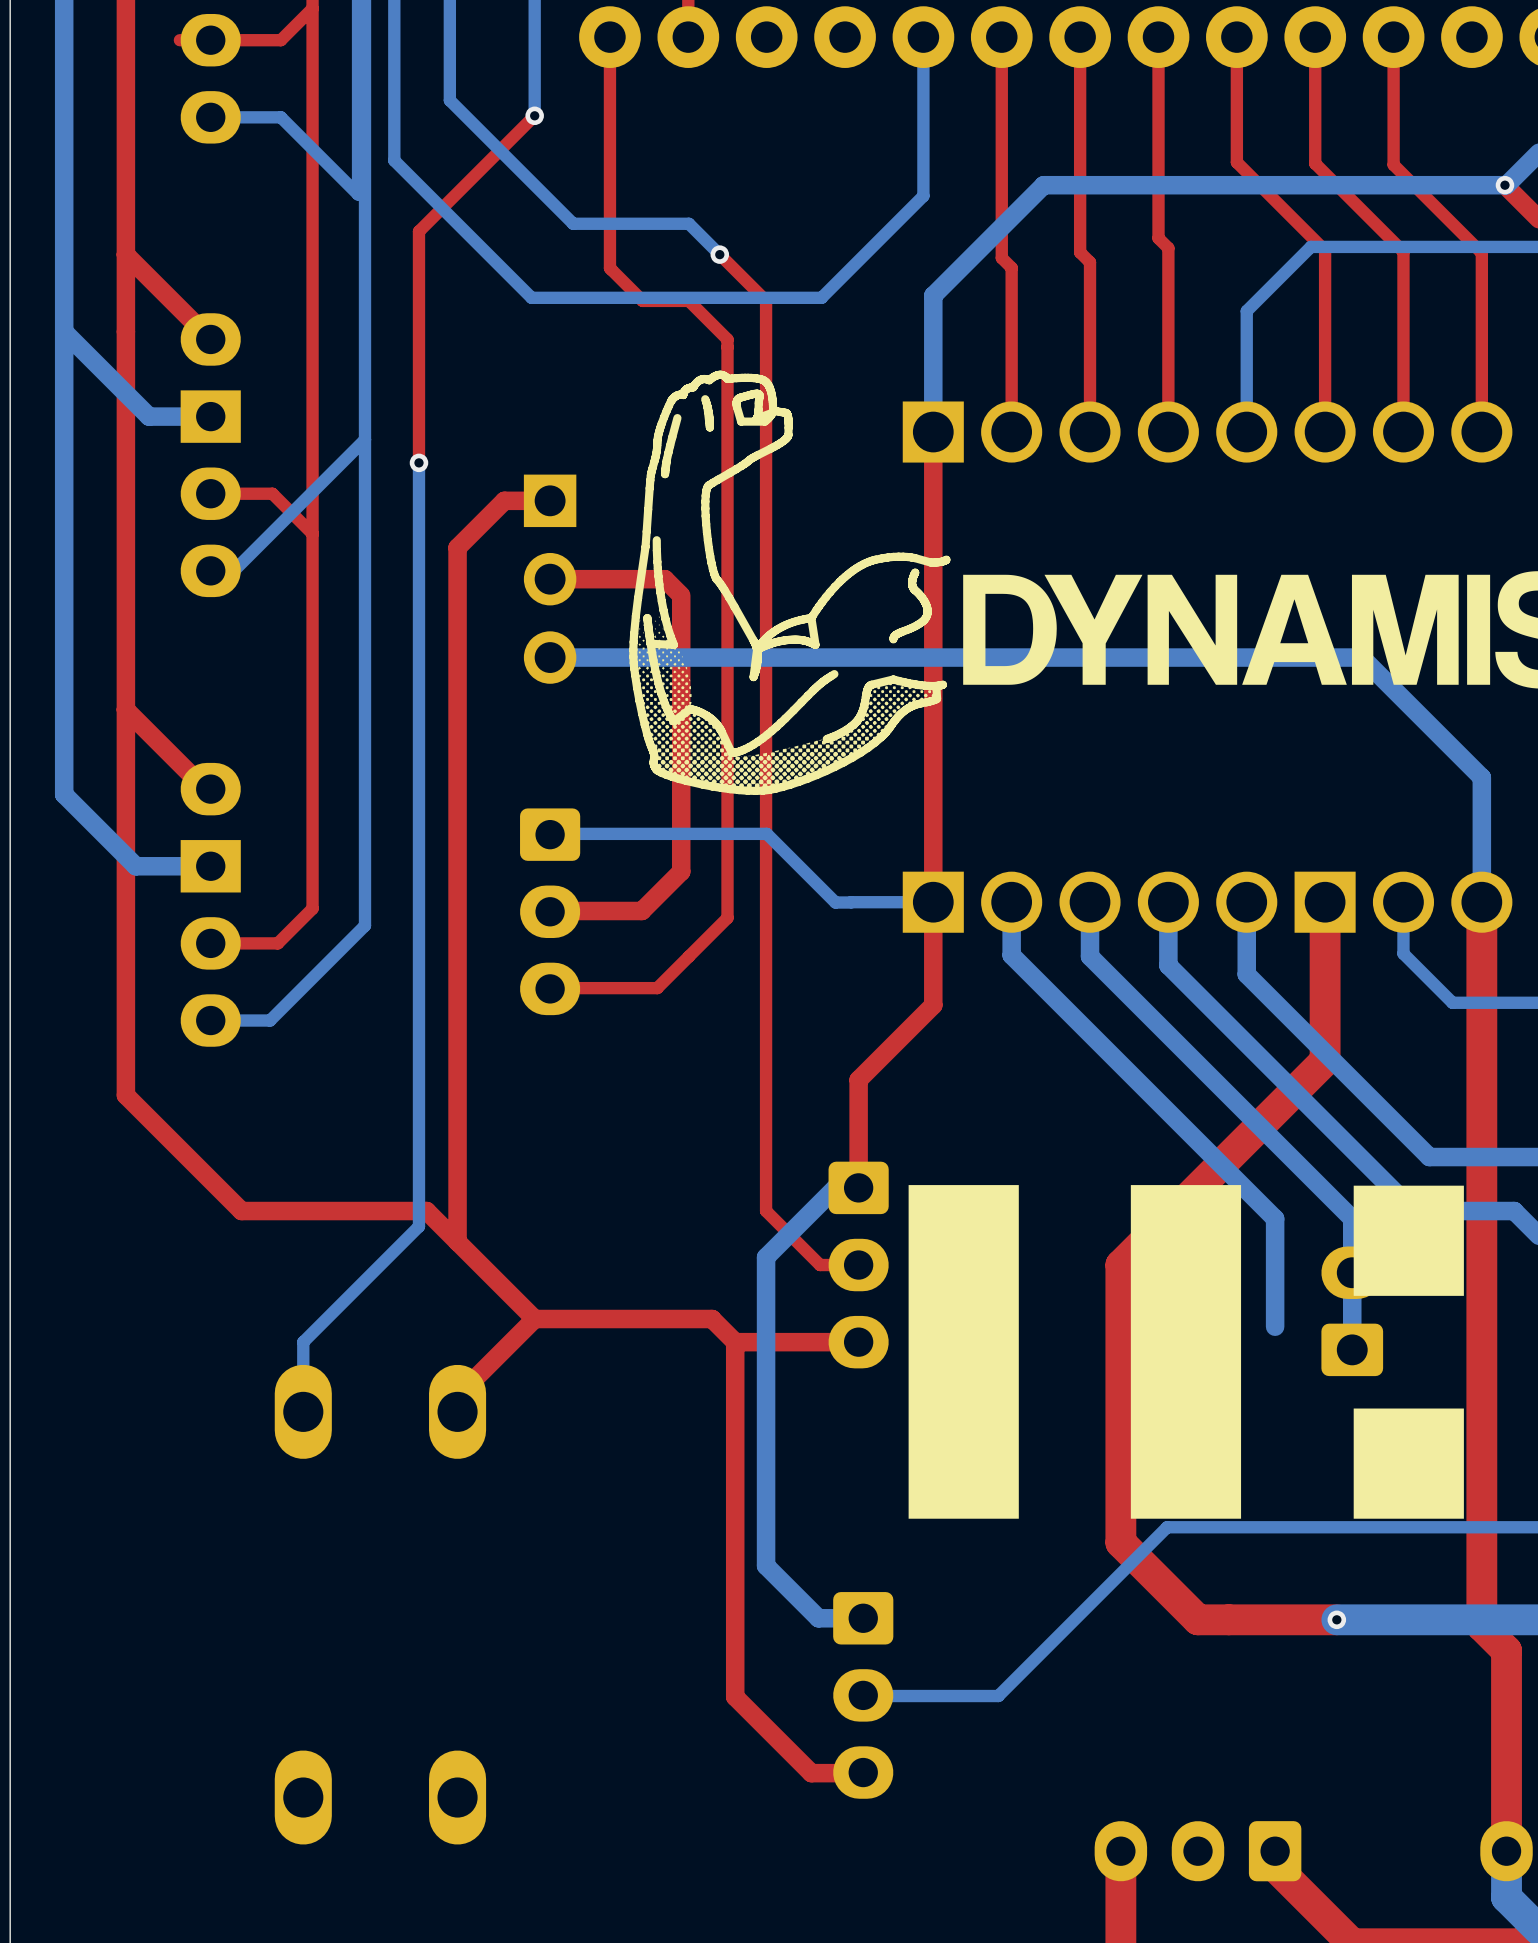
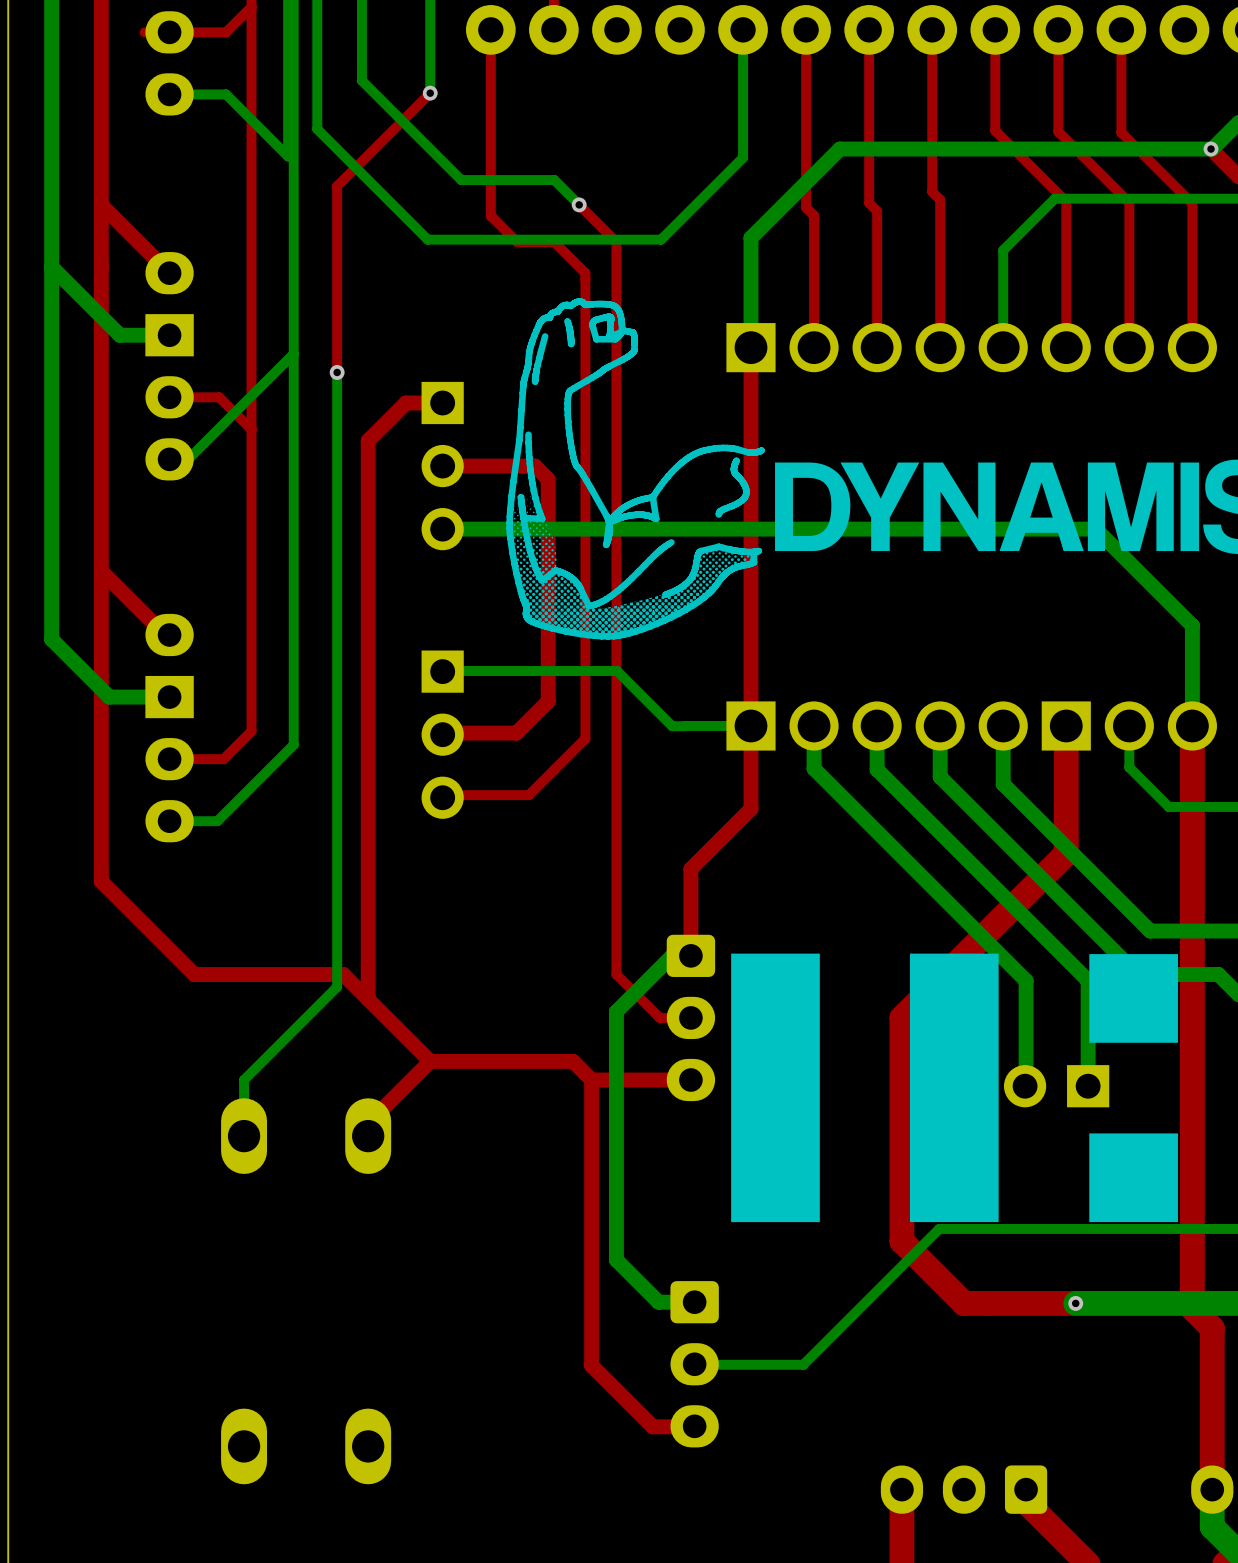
part footprint: [520, 808, 581, 1016] -> [421, 650, 464, 819]
part: (1352, 1311) -> none
part: none -> (1056, 1086)

